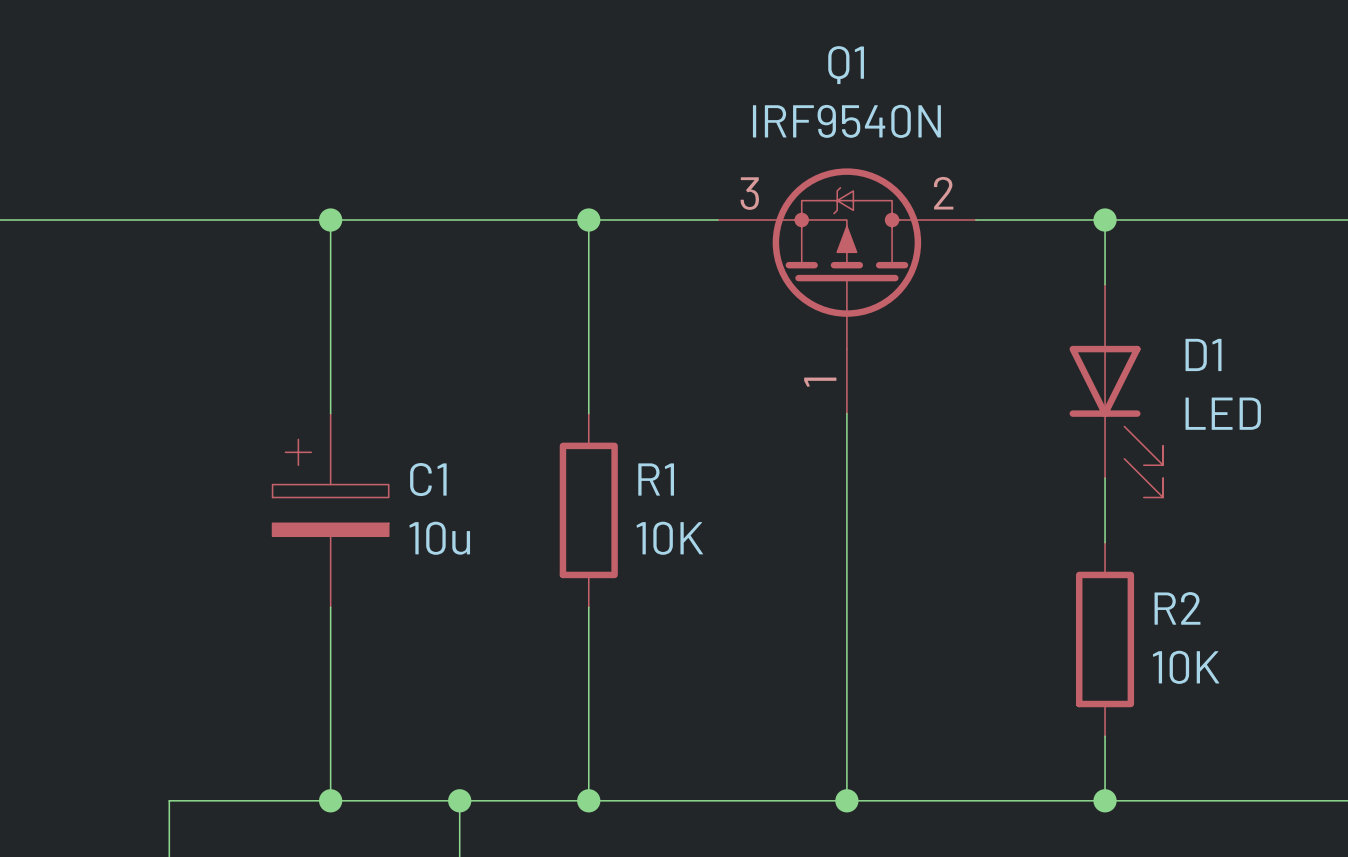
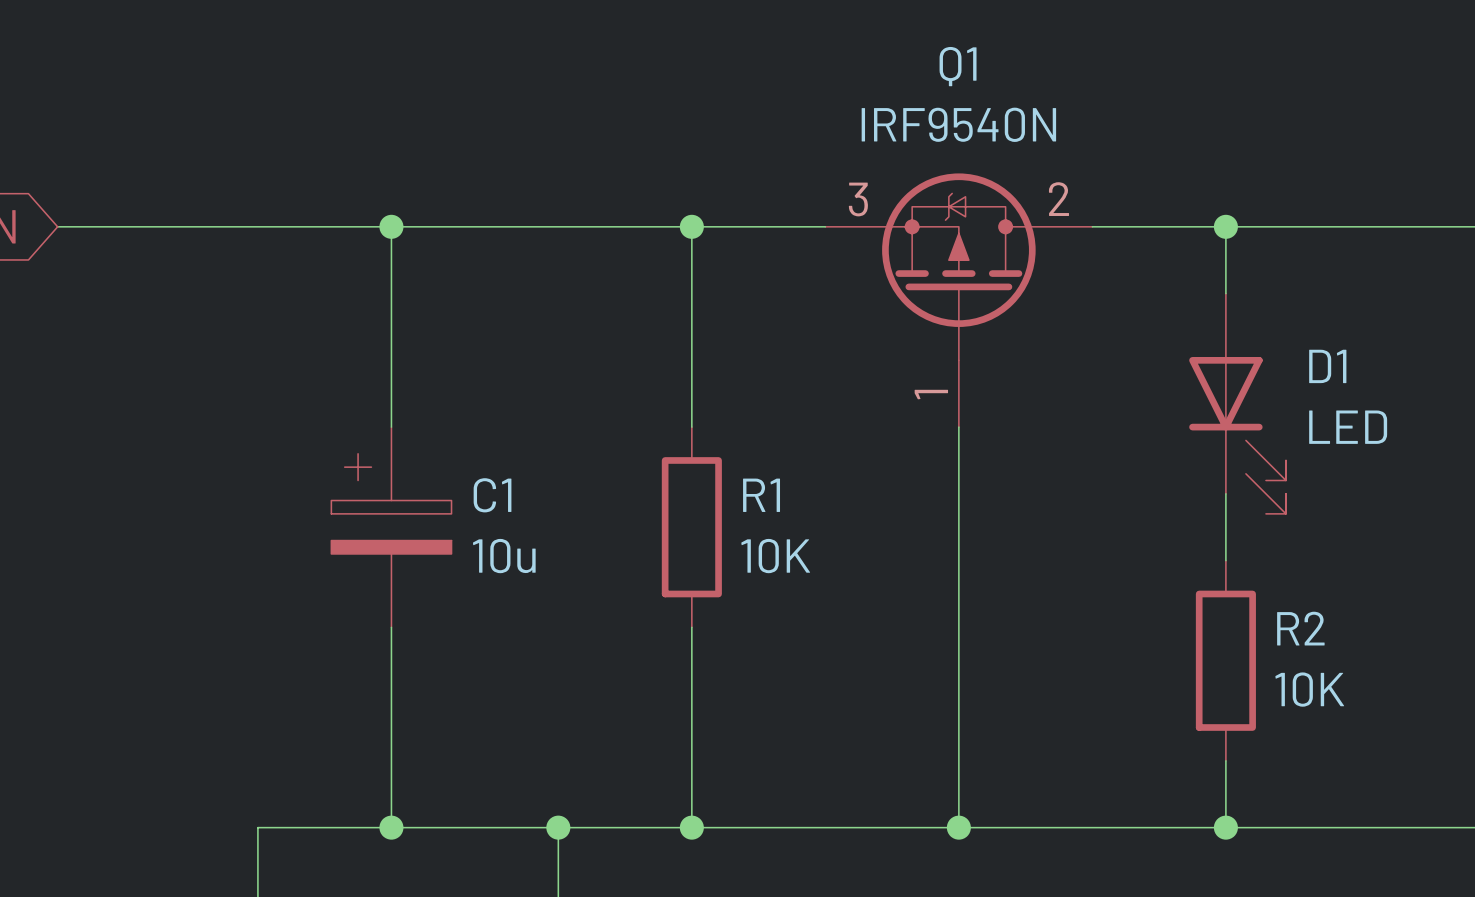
wire: (330, 220) (330, 413) -> (391, 226) (391, 427)
junction position: (330, 220) -> (391, 226)
C1 position: (330, 510) -> (391, 527)
wire: (330, 607) (330, 800) -> (391, 627) (391, 827)
junction position: (330, 800) -> (391, 827)

